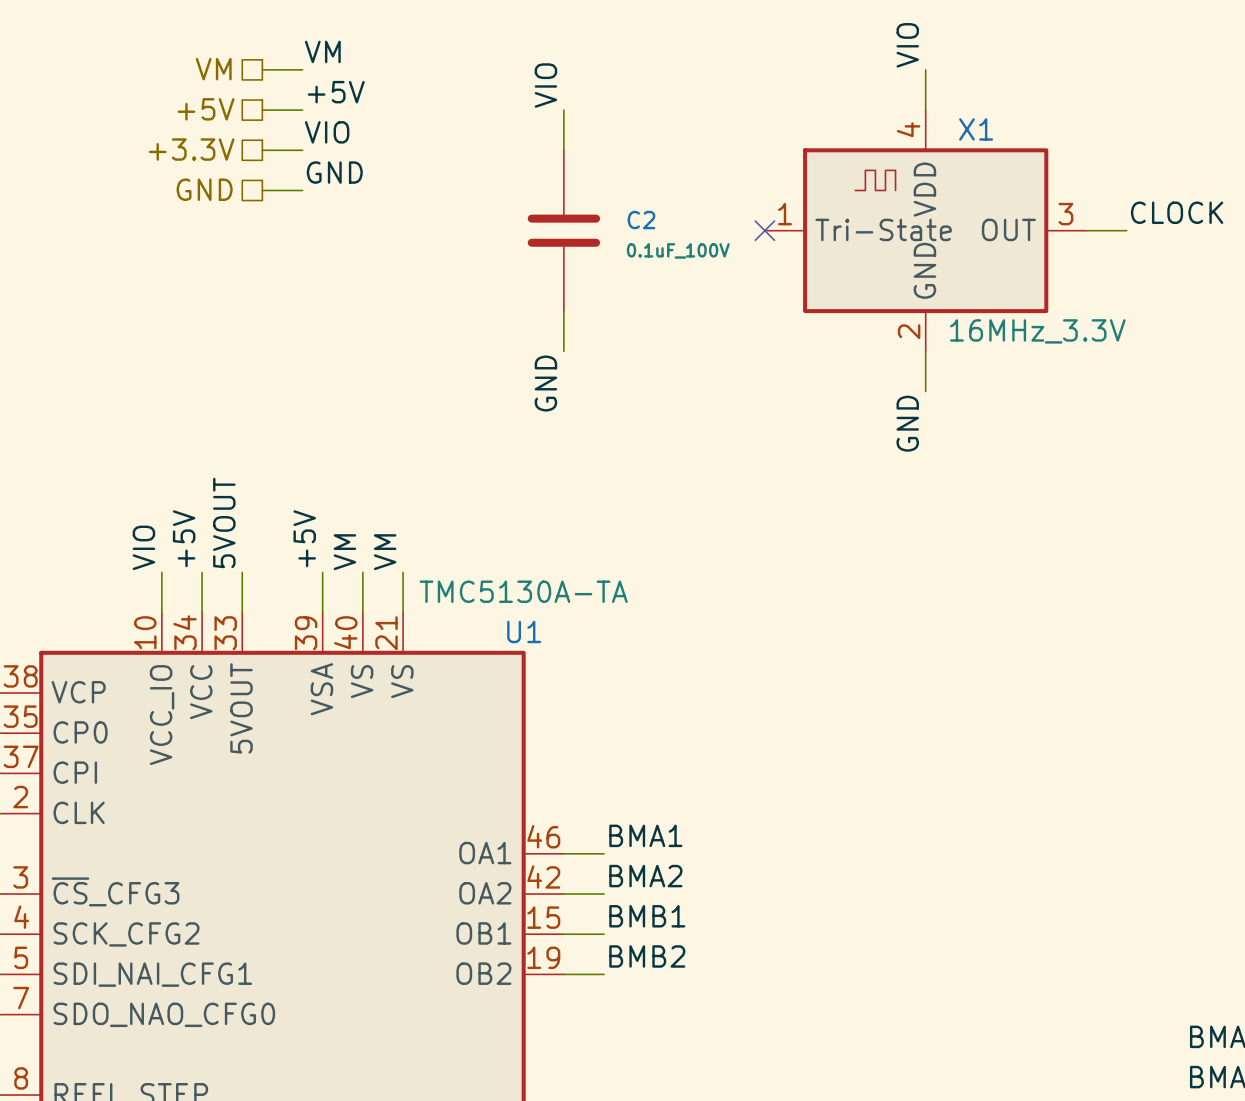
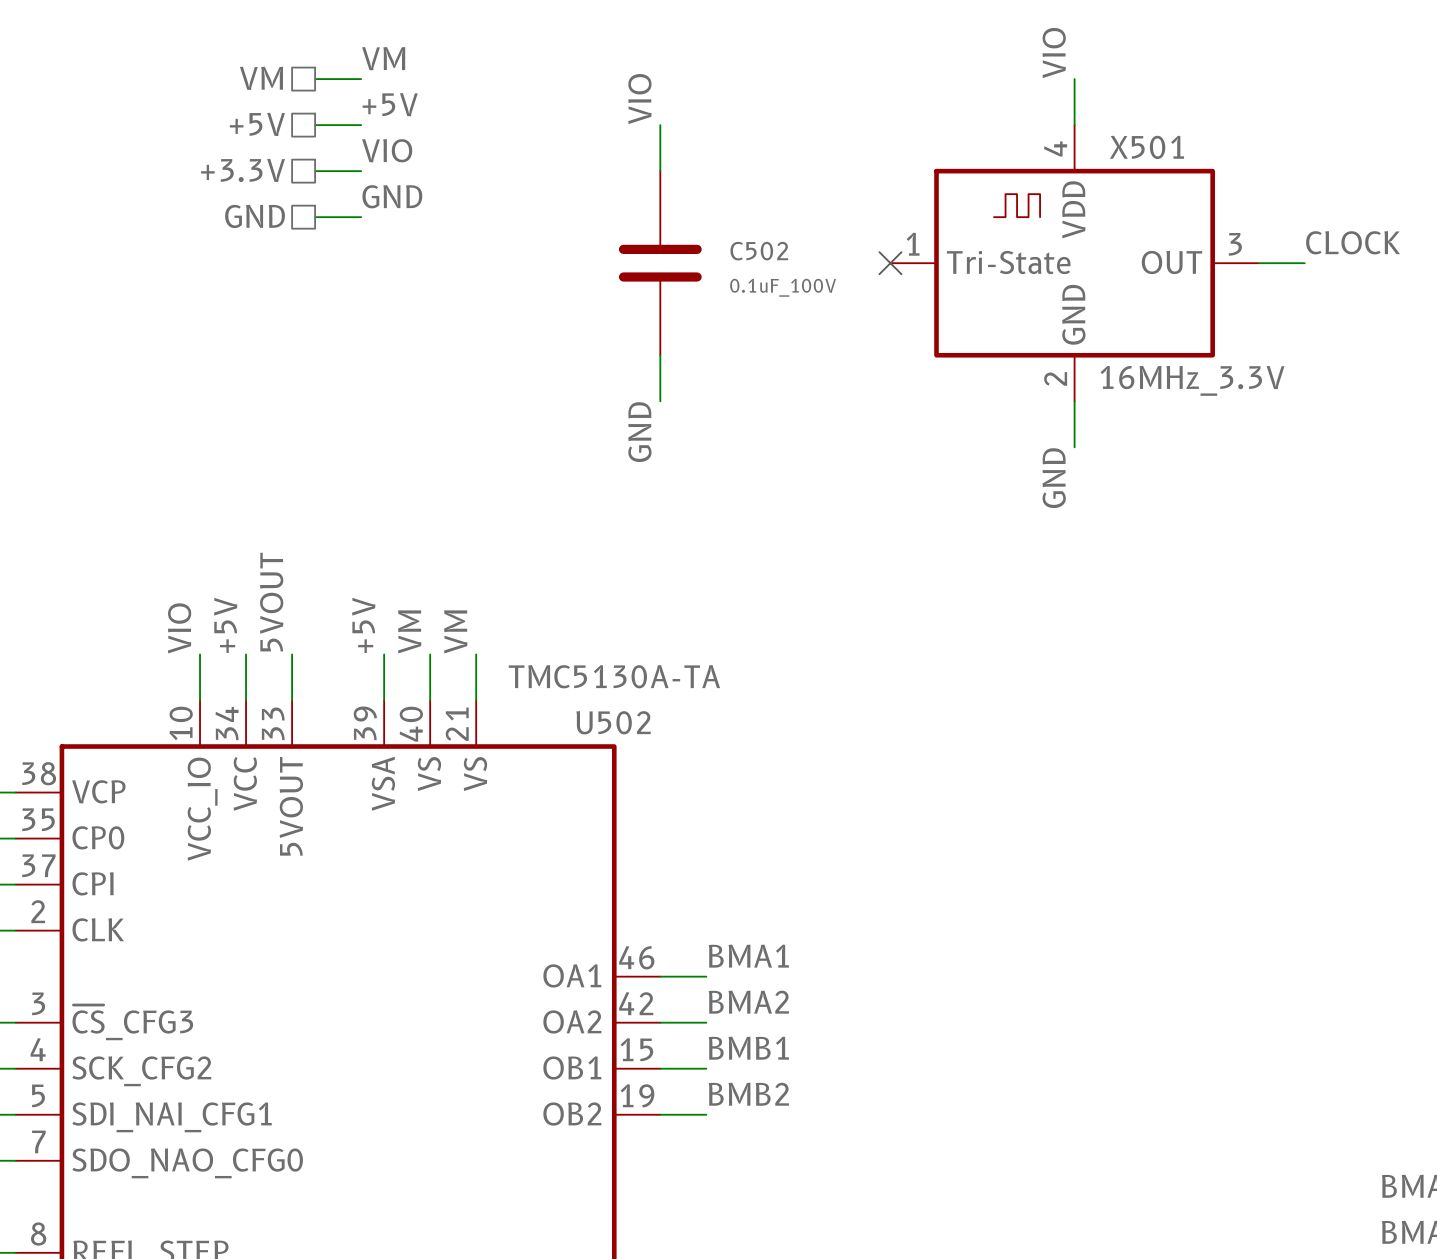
X1 name: X1 (976, 129) -> X501 (1146, 147)
C2 name: C2 (641, 220) -> C502 (759, 251)
U1 name: U1 (524, 631) -> U502 (613, 722)

